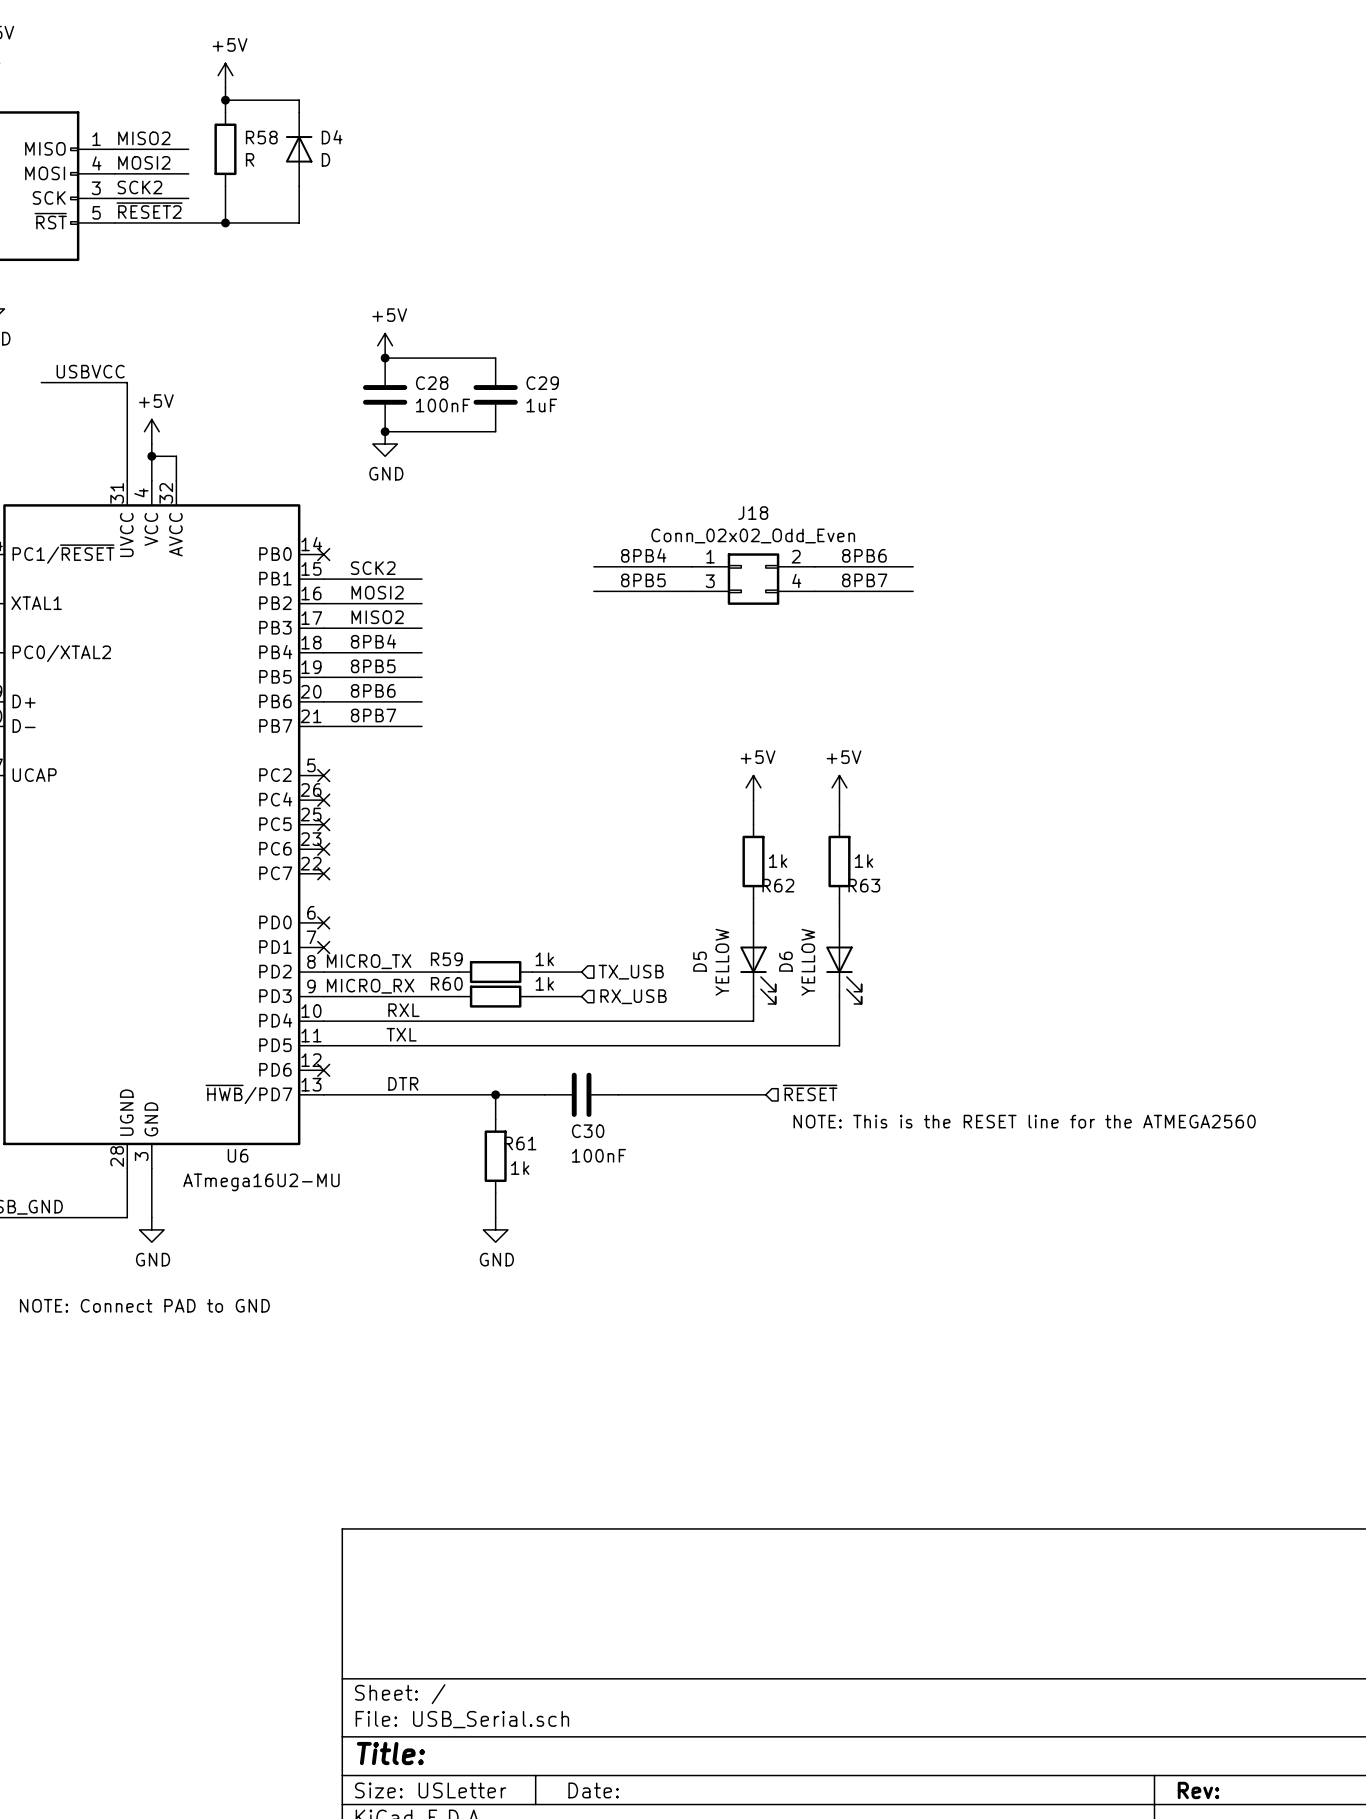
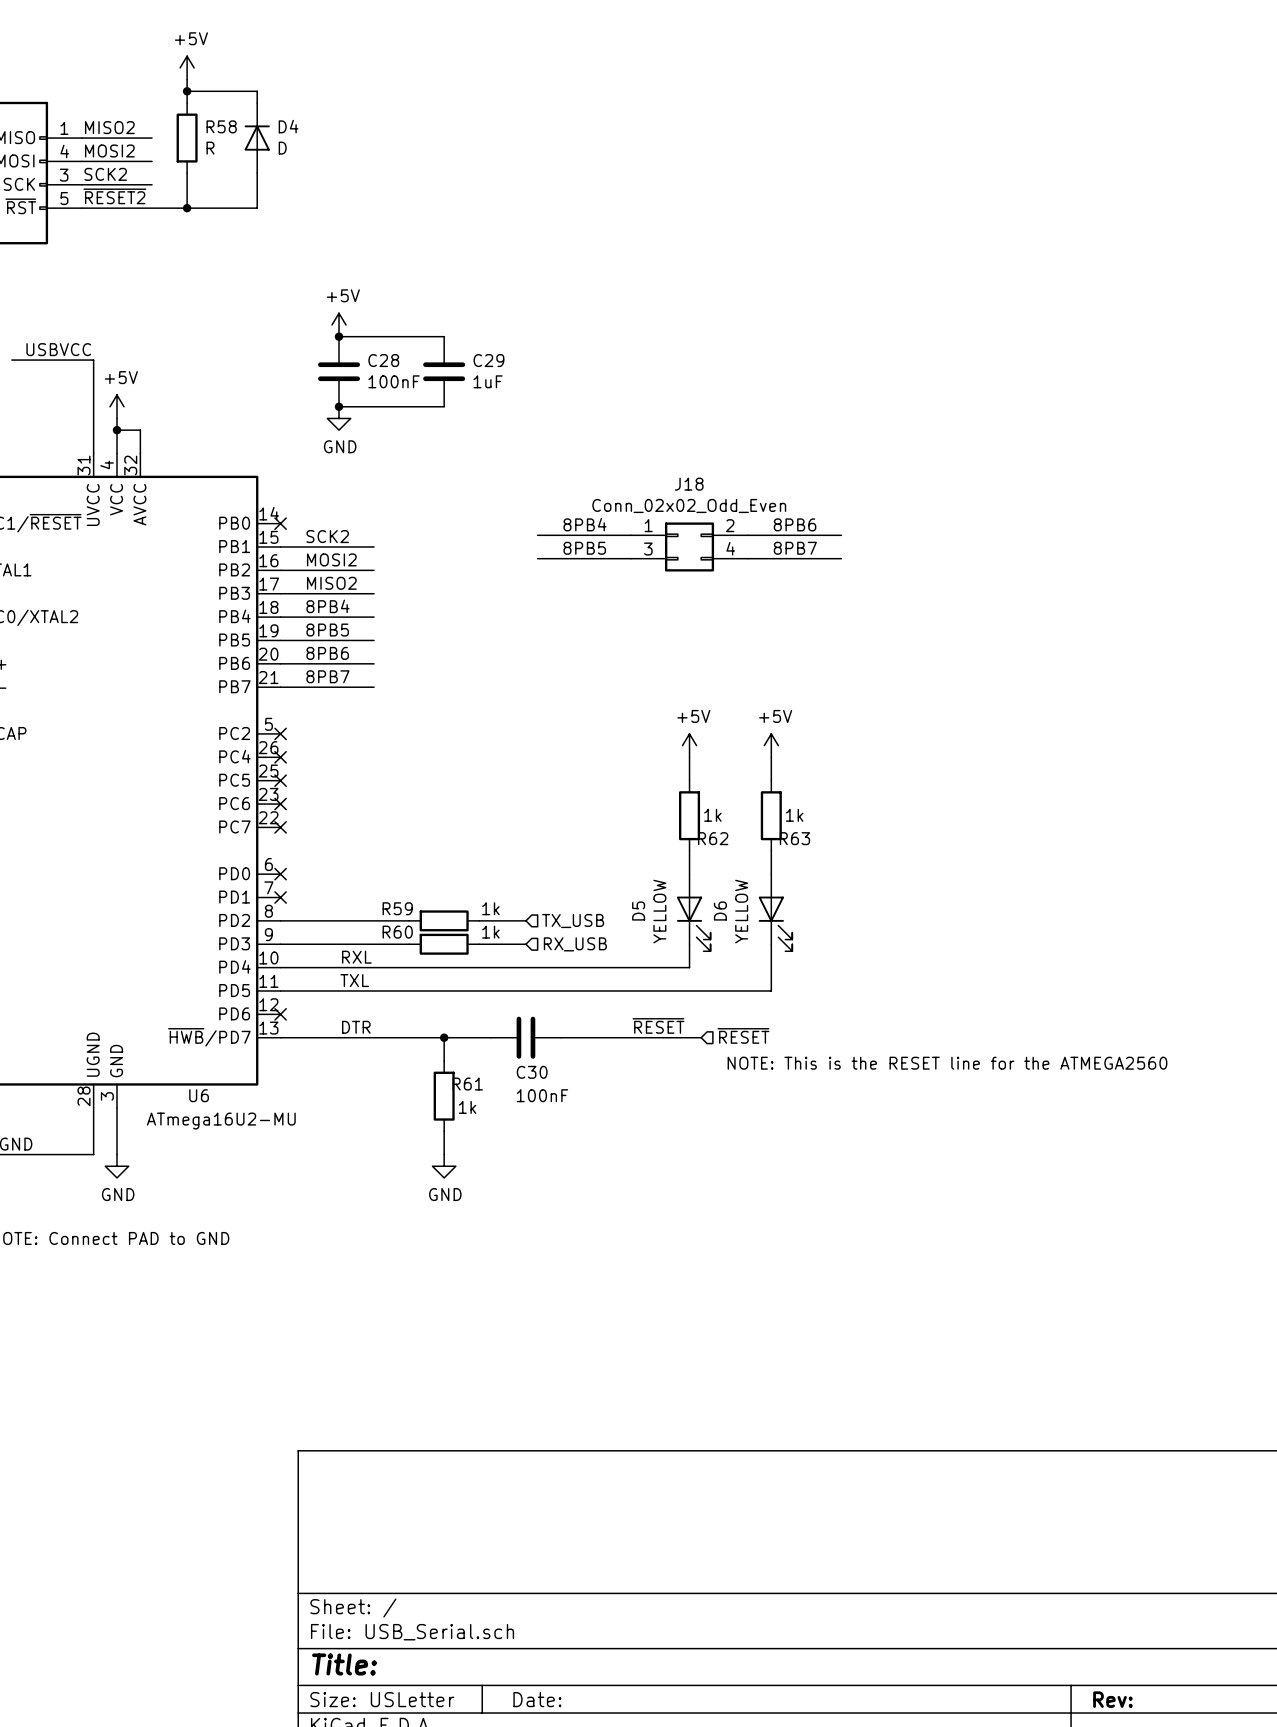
label: MICRO_TX (369, 961) -> none
label: MICRO_RX (370, 986) -> none
label: none -> ~{RESET} (658, 1025)

